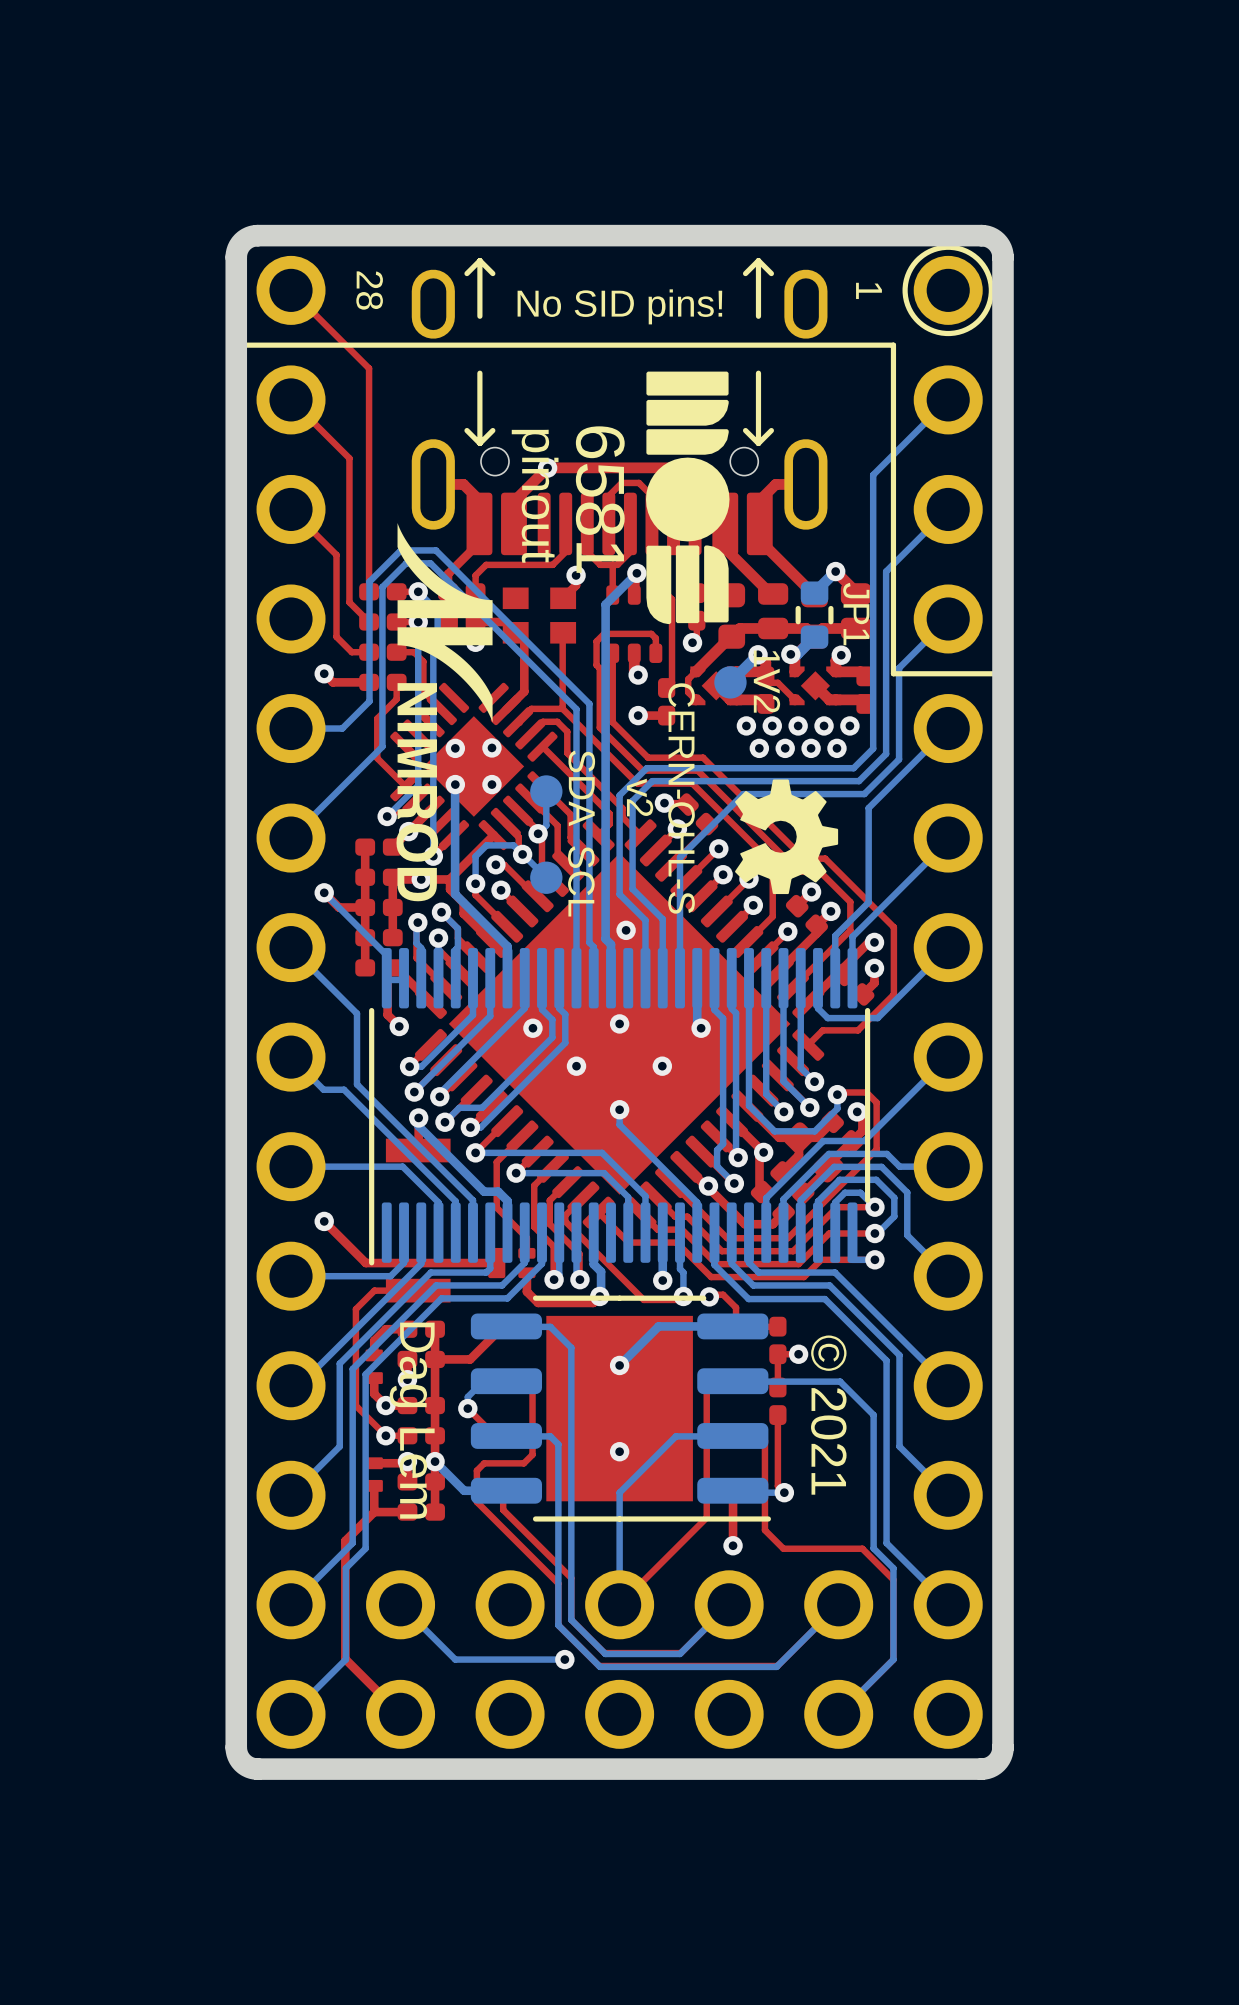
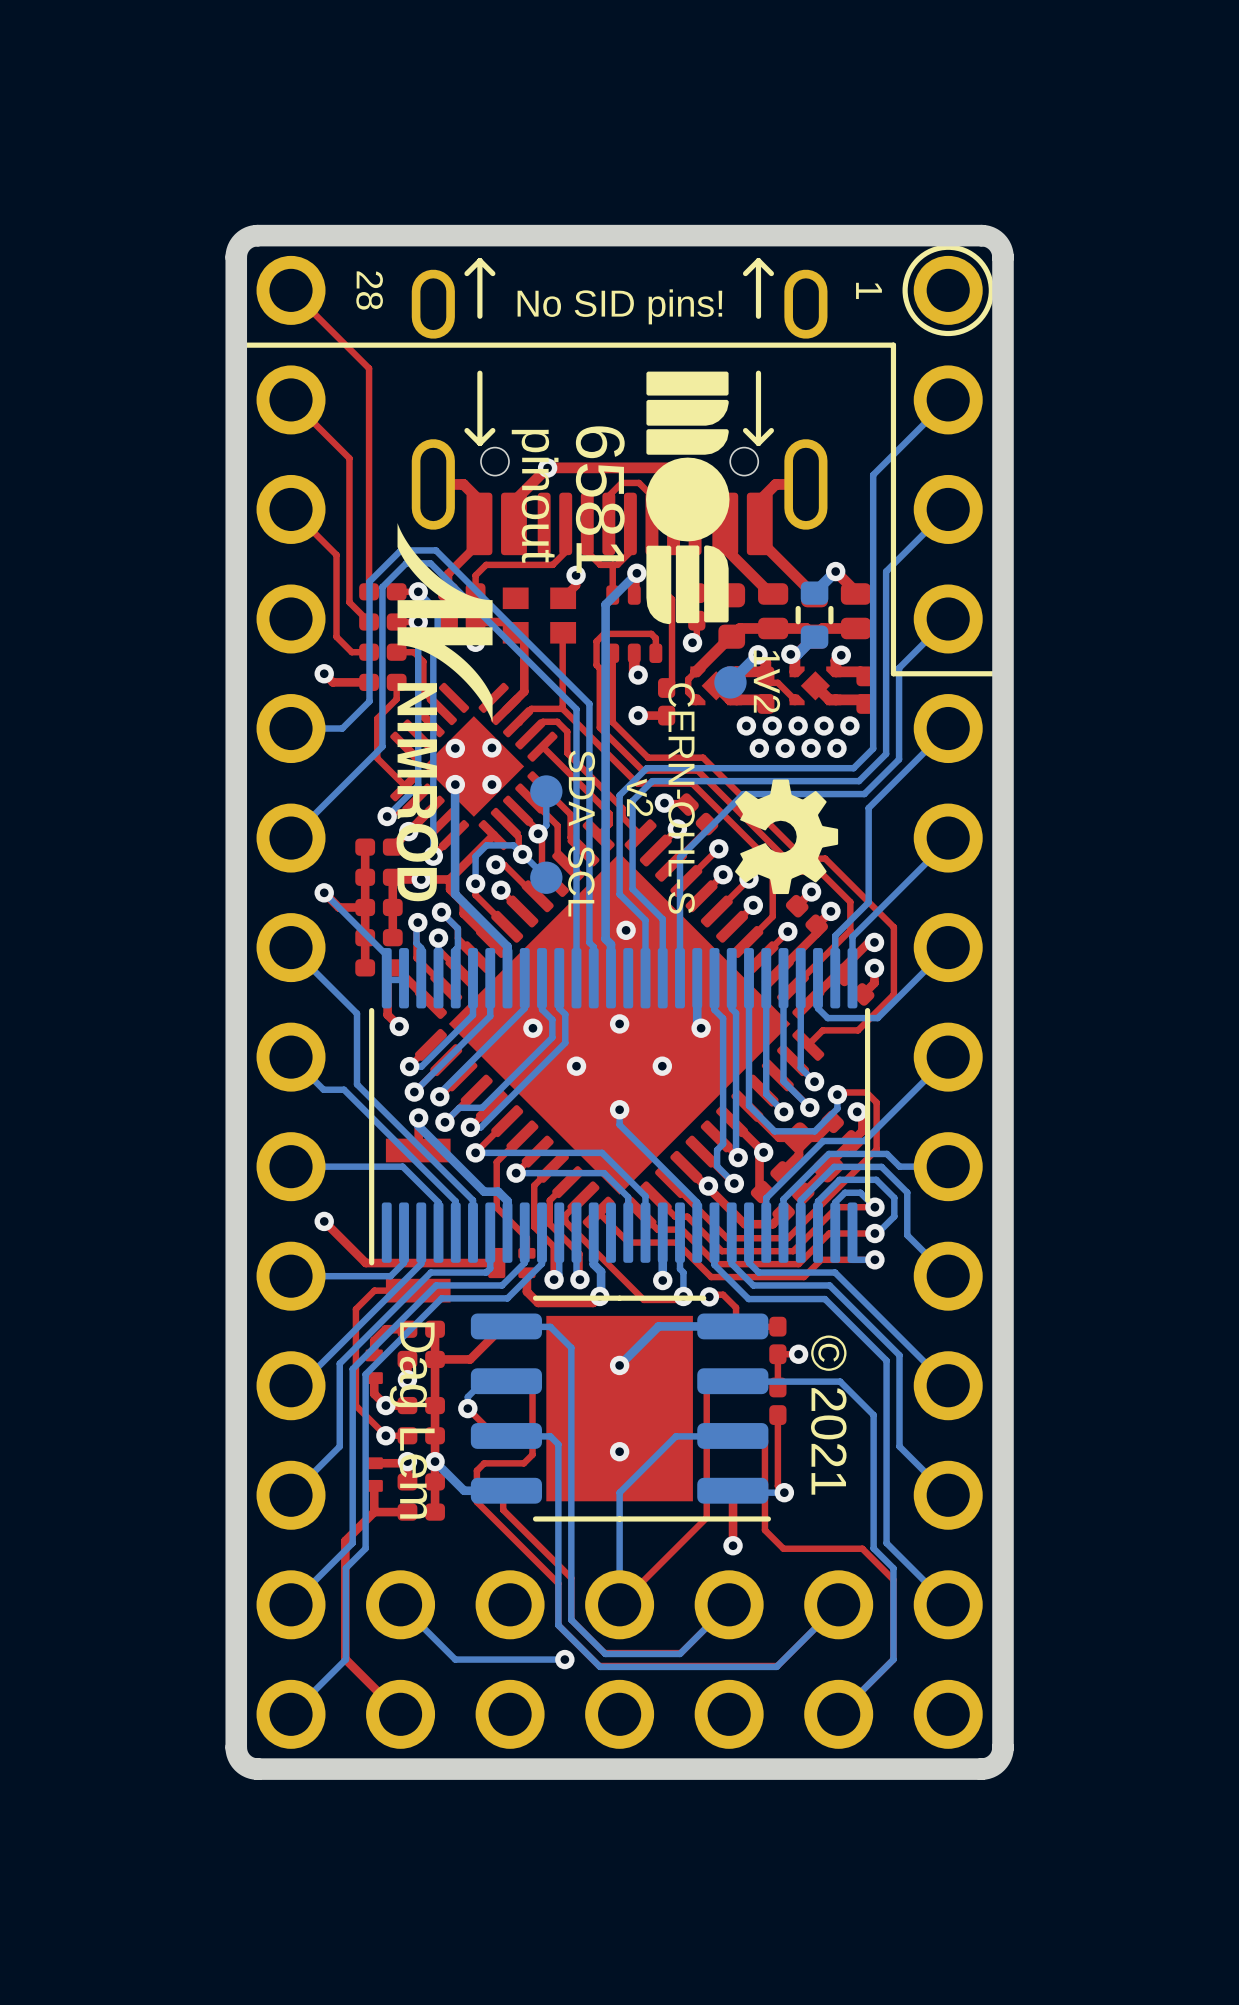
JP1 name: JP1 (856, 614) -> none

